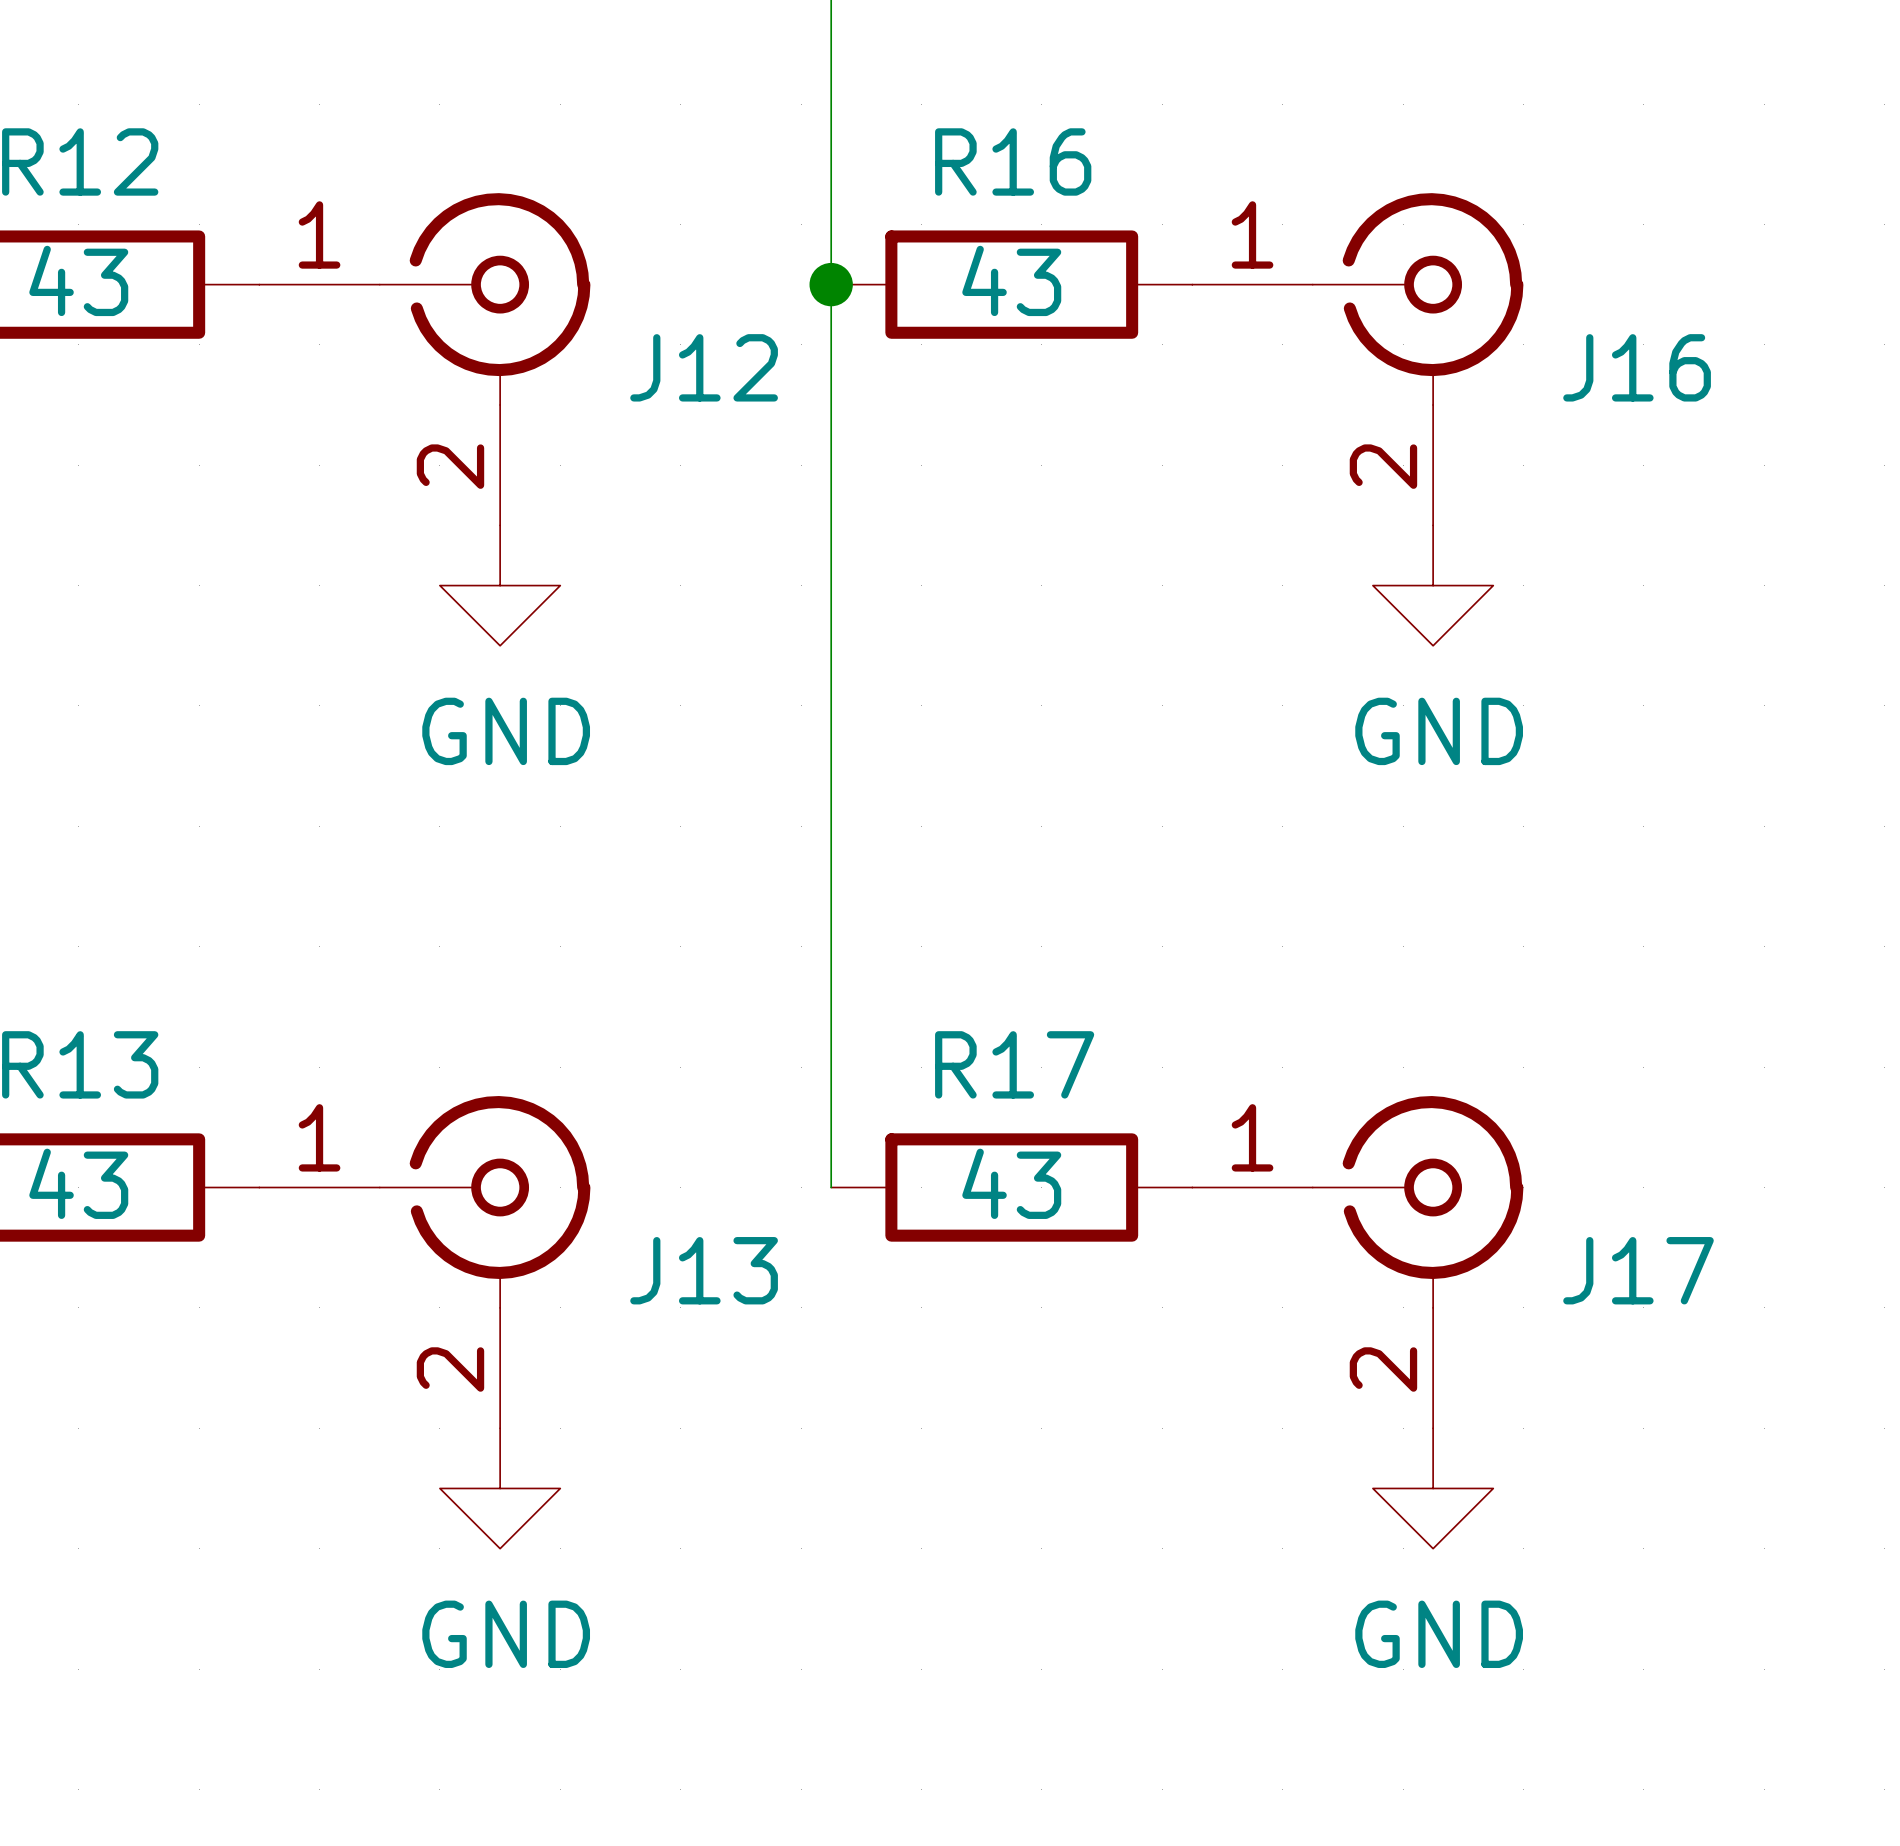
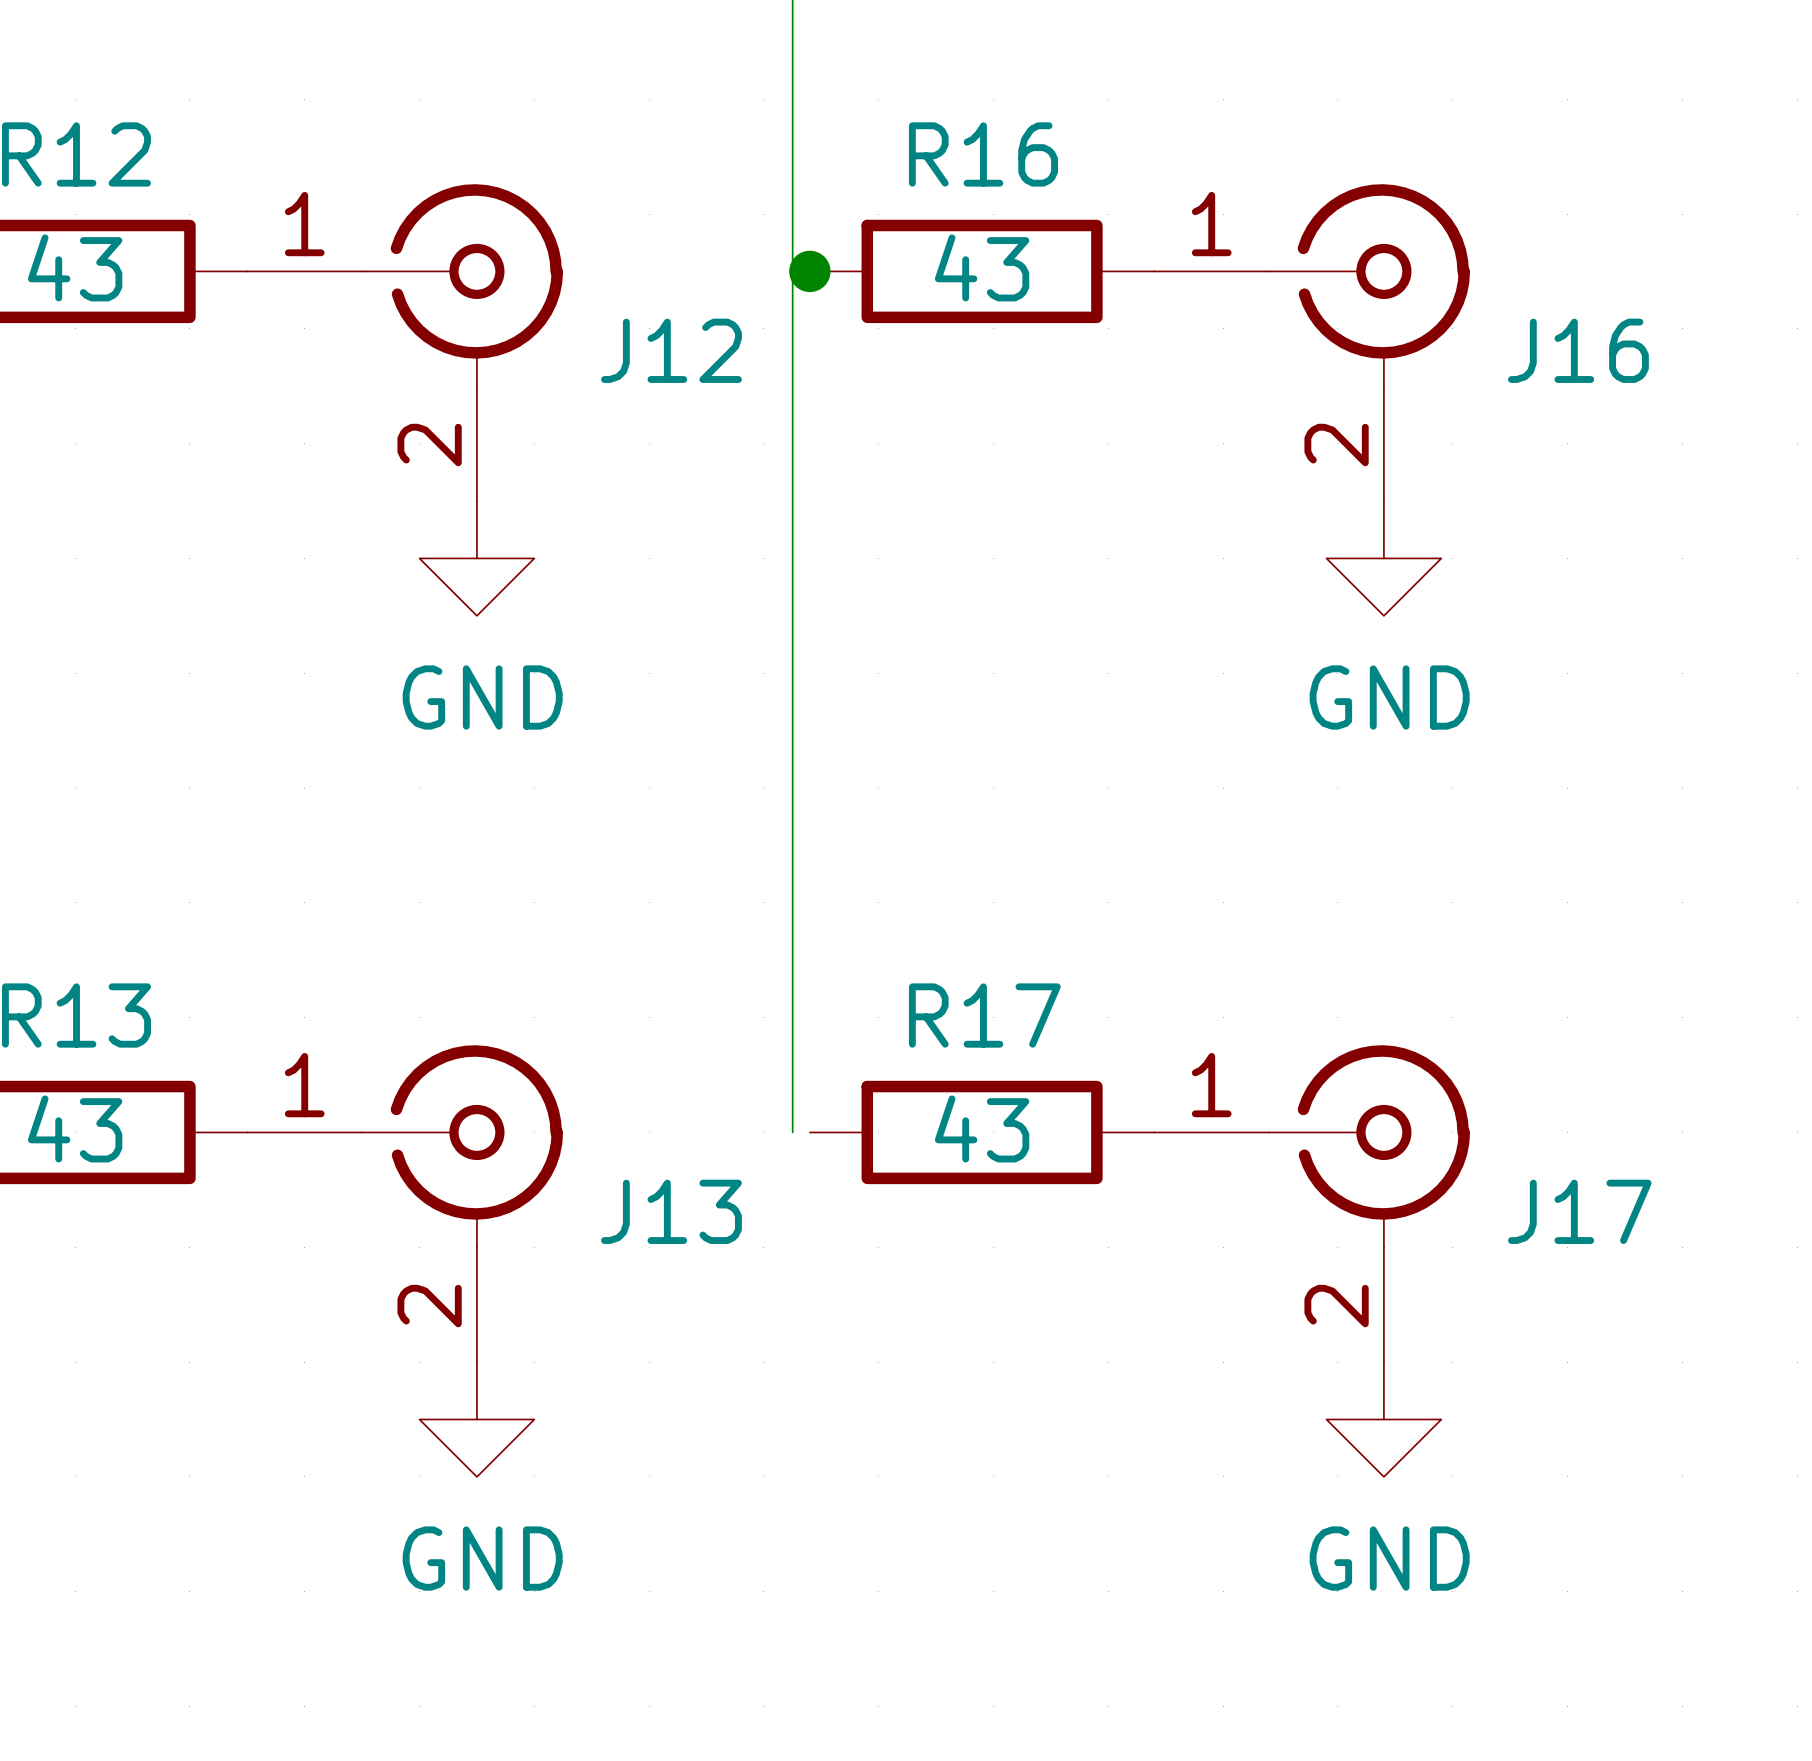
junction position: (831, 284) -> (809, 271)
R16 position: (1011, 284) -> (982, 271)
J16 position: (1357, 359) -> (1312, 342)
power symbol position: GND (1433, 585) -> GND (1383, 558)
R17 position: (1011, 1187) -> (982, 1132)
J17 position: (1357, 1262) -> (1312, 1203)
power symbol position: GND (1433, 1488) -> GND (1383, 1419)

